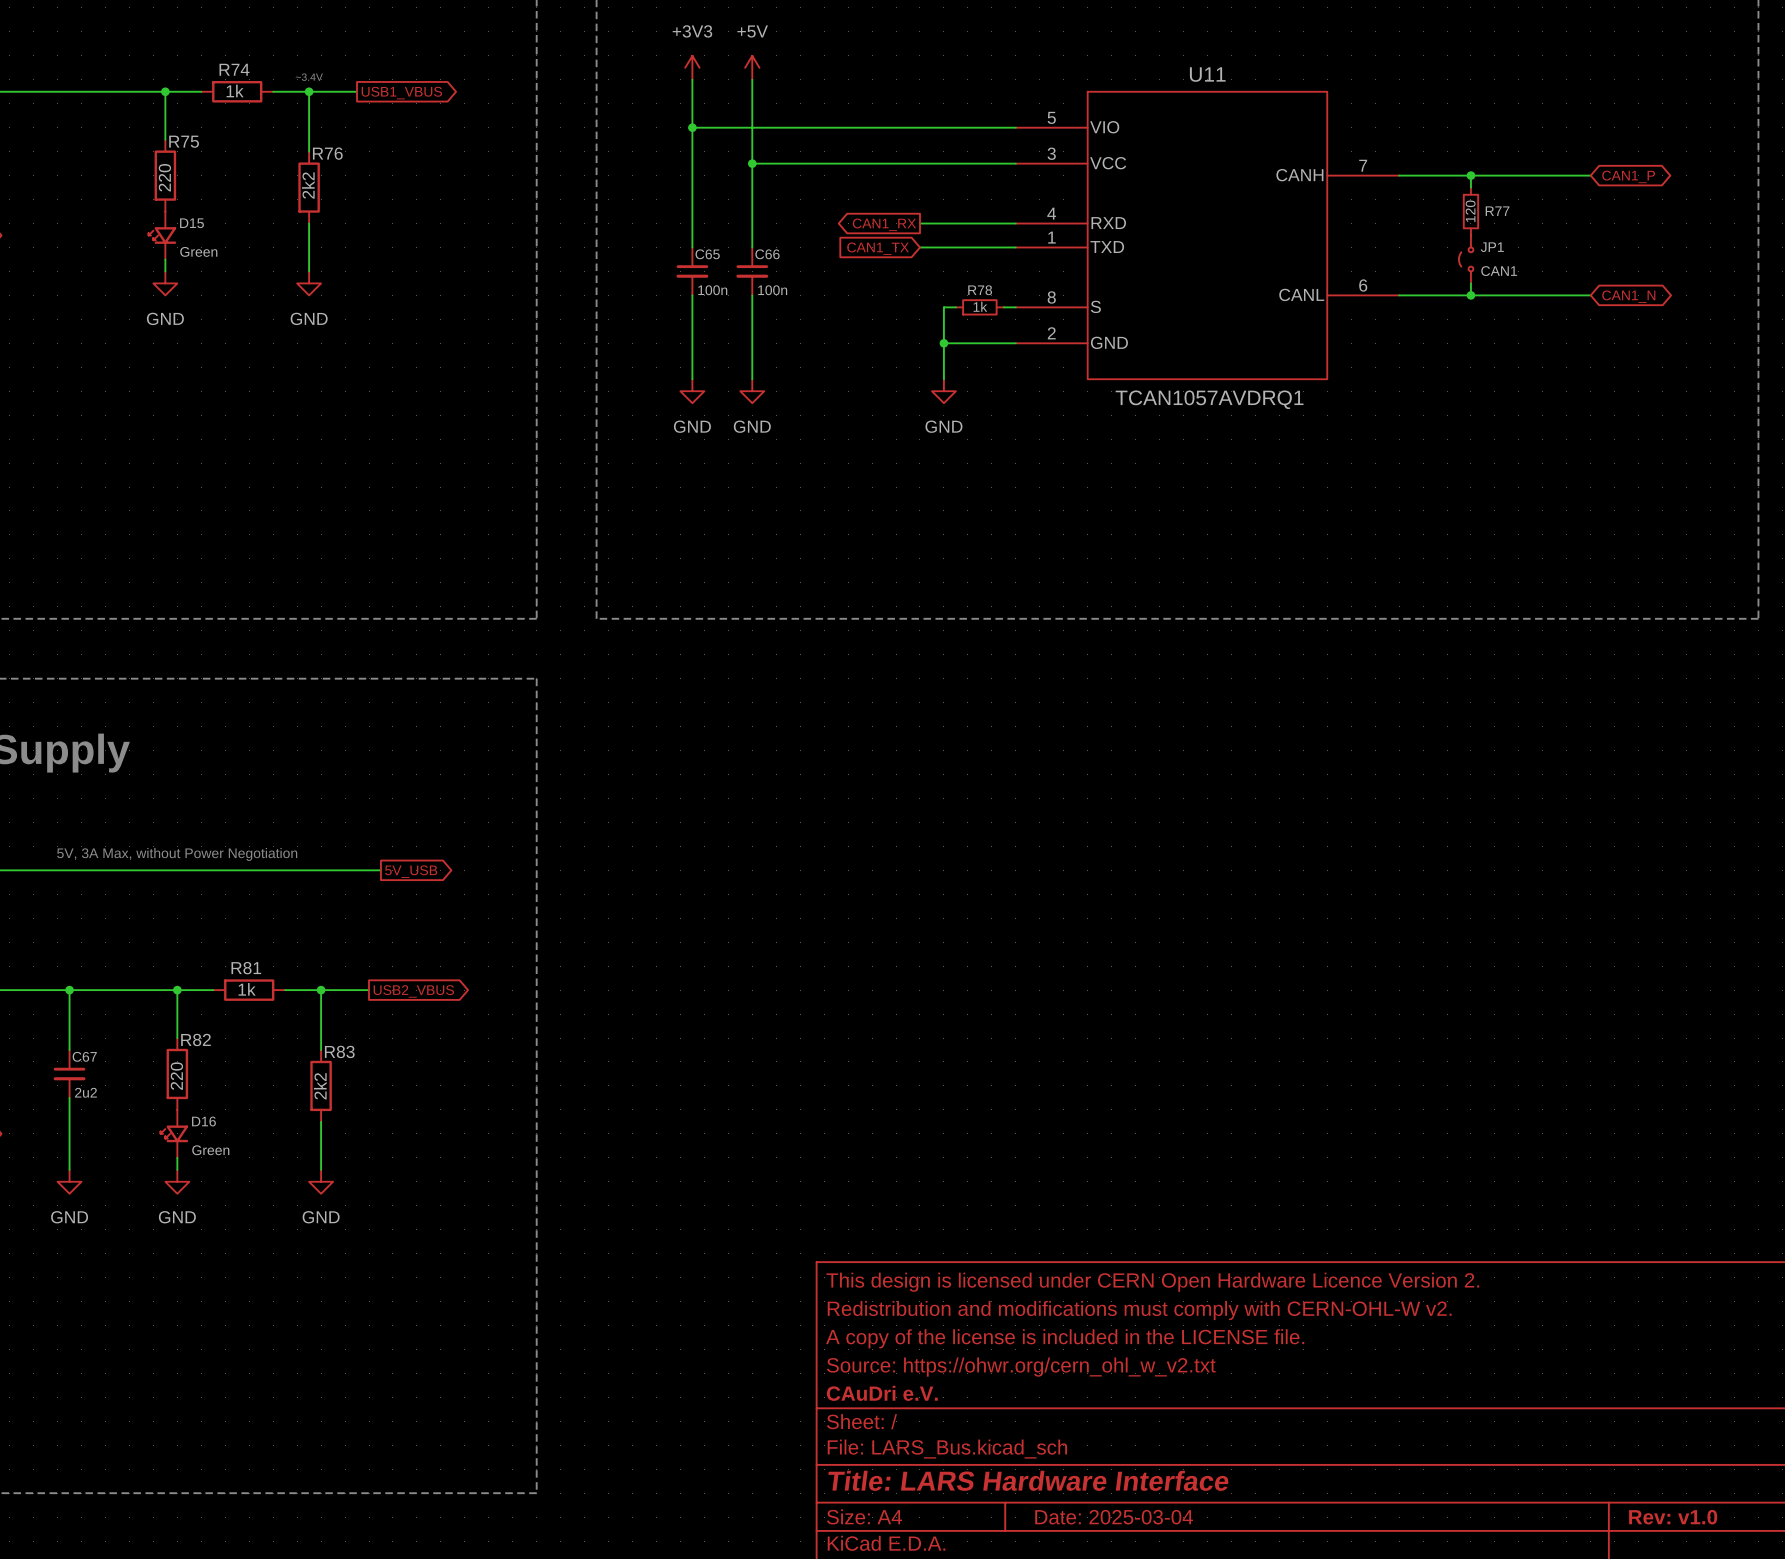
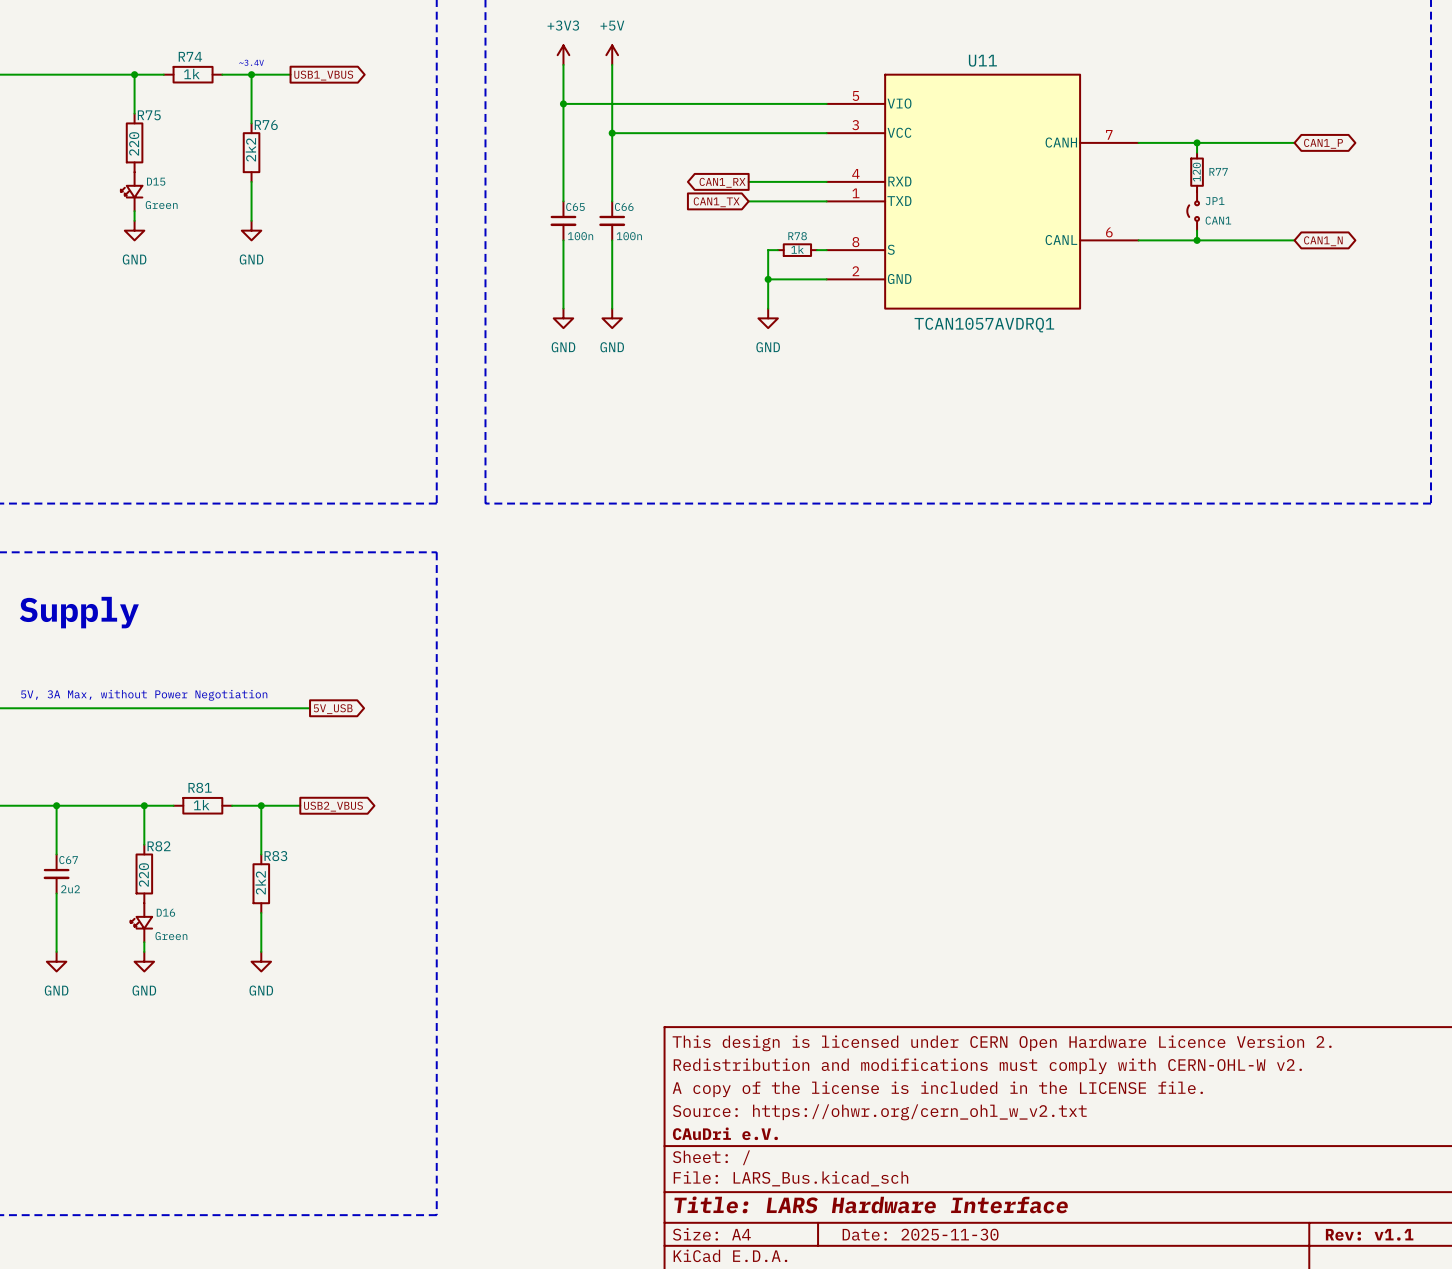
title block: Date: 2025-03-04 (1114, 1517) -> Date: 2025-11-30 (920, 1234)
title block: Rev: v1.0 (1673, 1517) -> Rev: v1.1 (1369, 1234)

